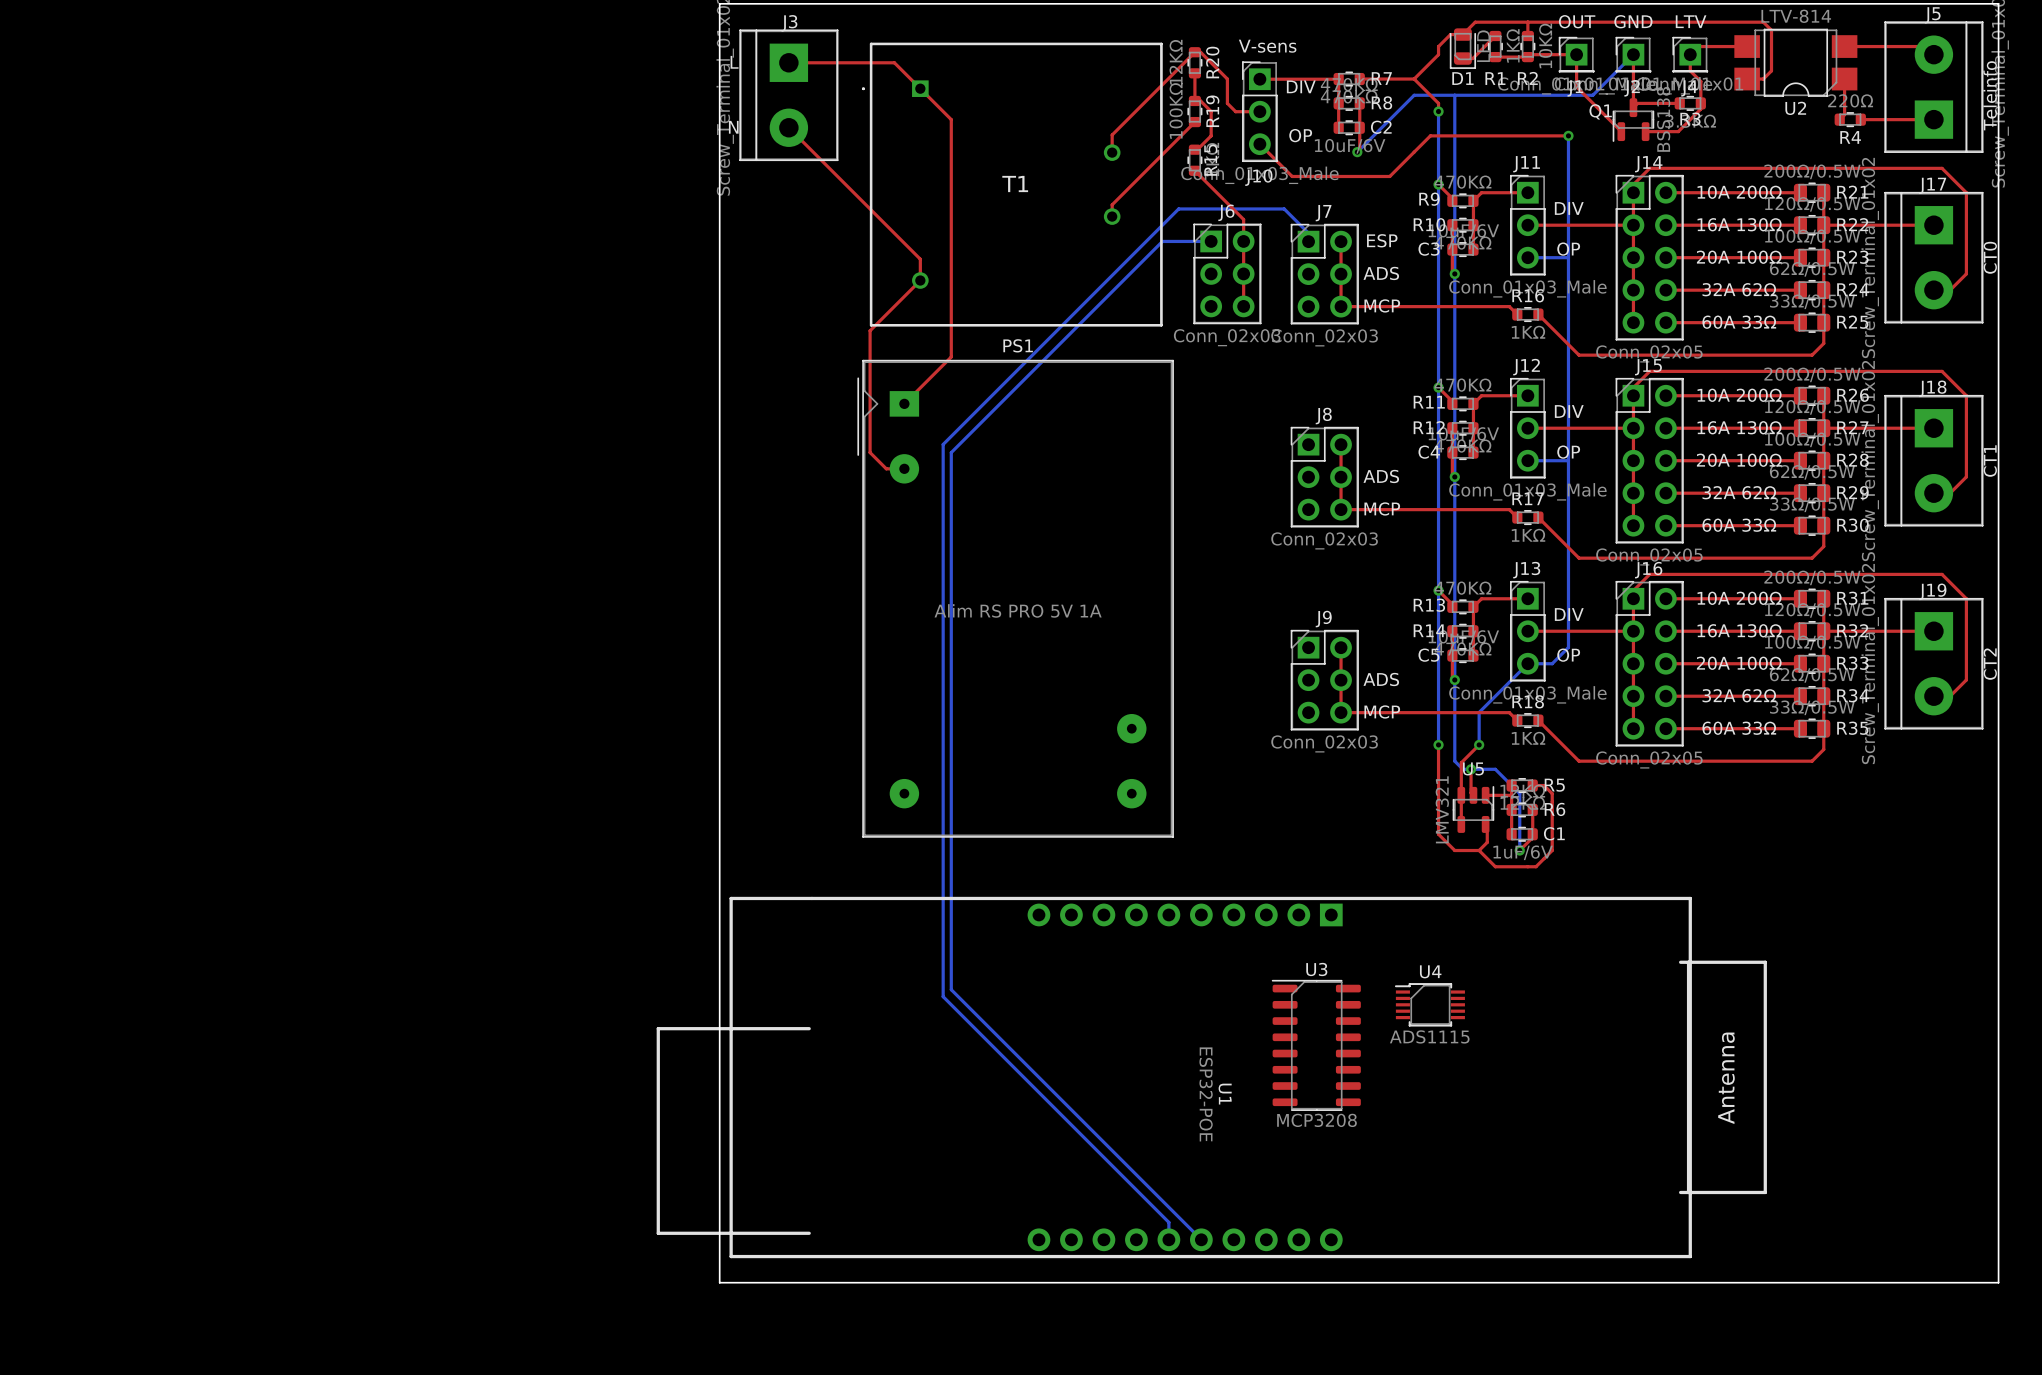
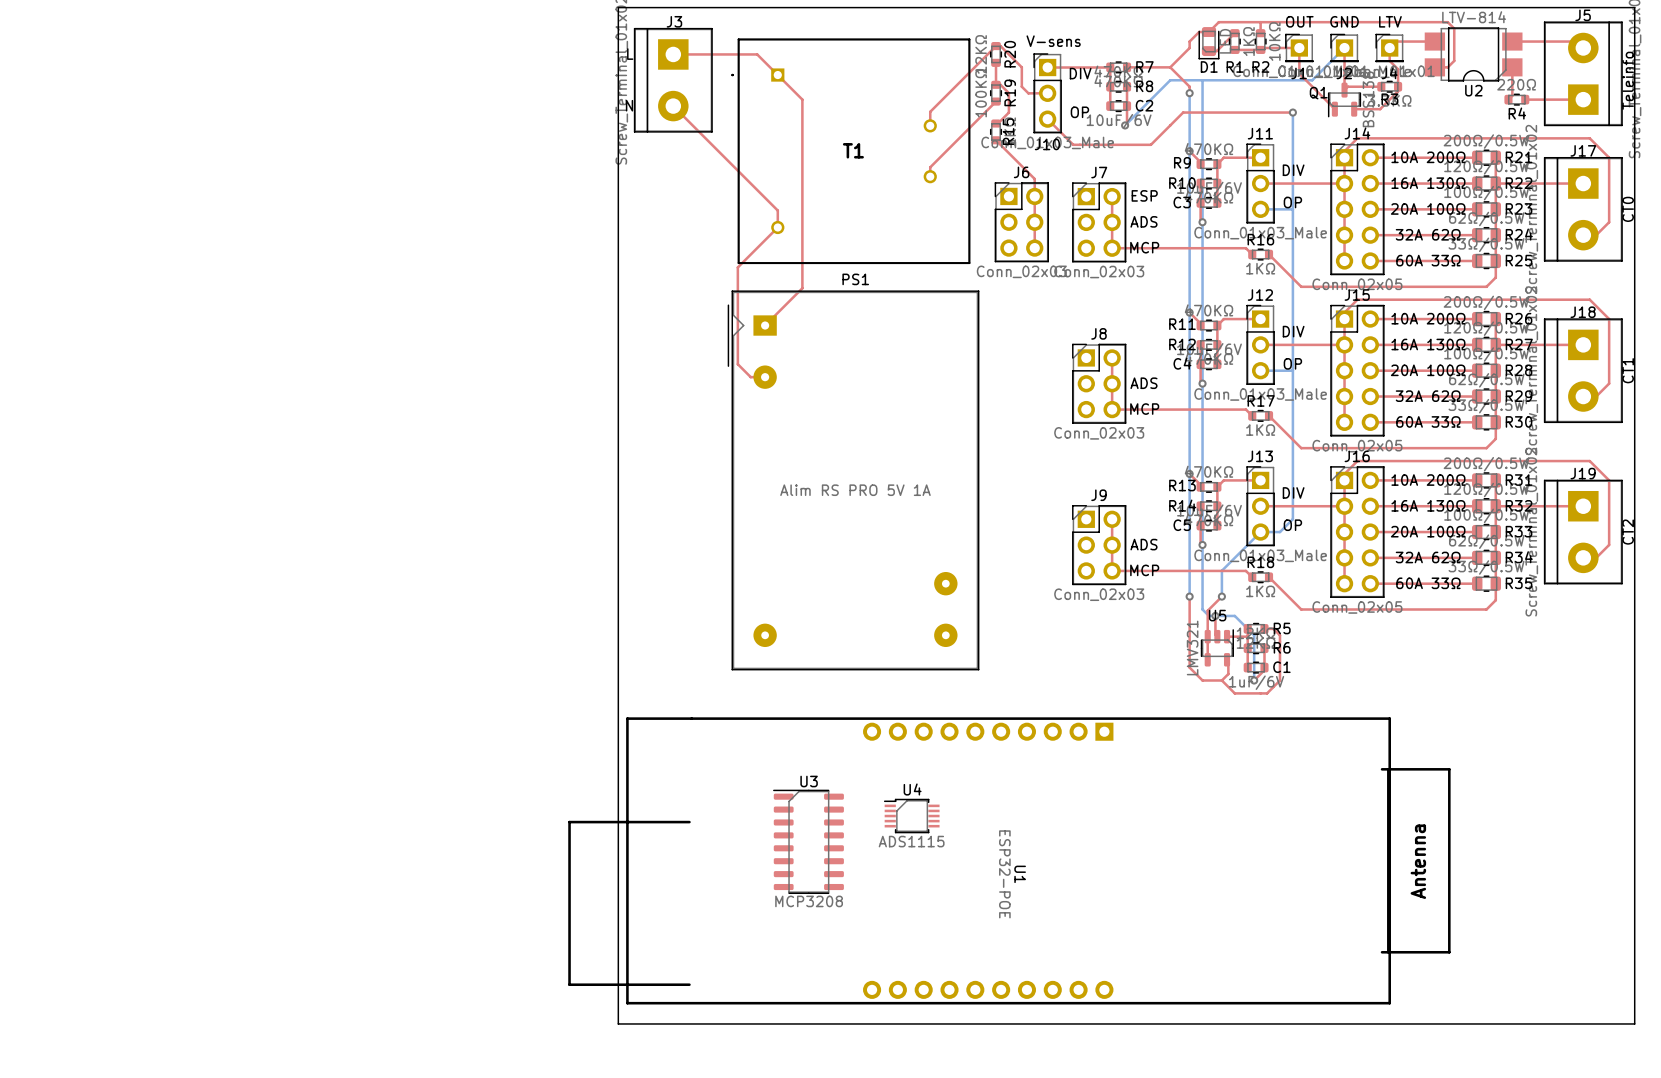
bottom track: (1211, 241) (1162, 241) (951, 452) (951, 989) (1201, 1239) -> none
bottom track: (1308, 241) (1308, 233) (1284, 208) (1178, 208) (943, 444) (943, 996) (1168, 1222) (1168, 1239) -> none
U4 position: (1429, 1004) -> (911, 816)
U3 position: (1316, 1045) -> (808, 841)

